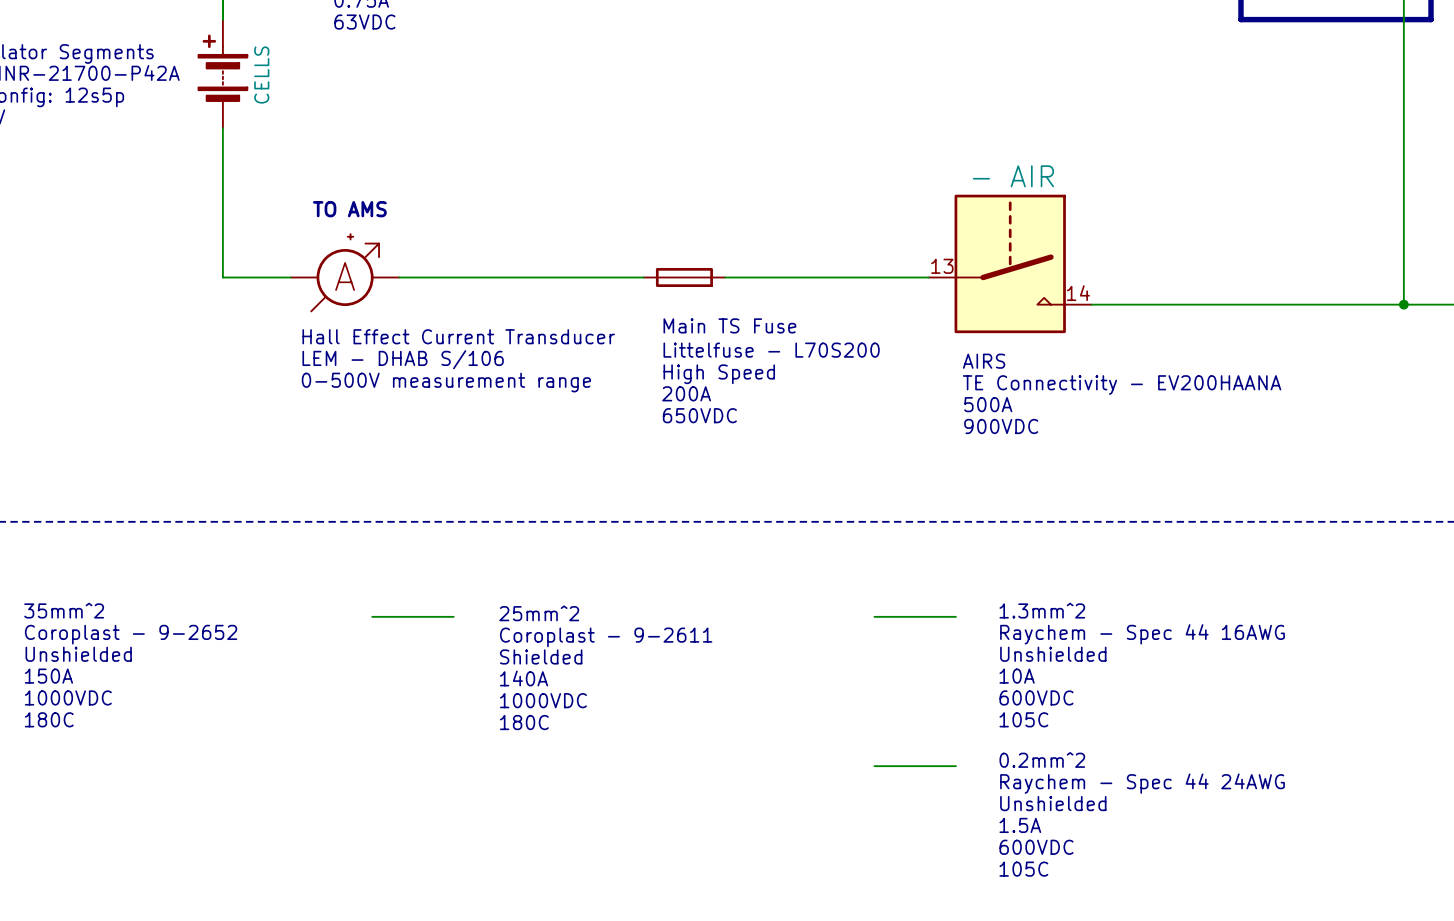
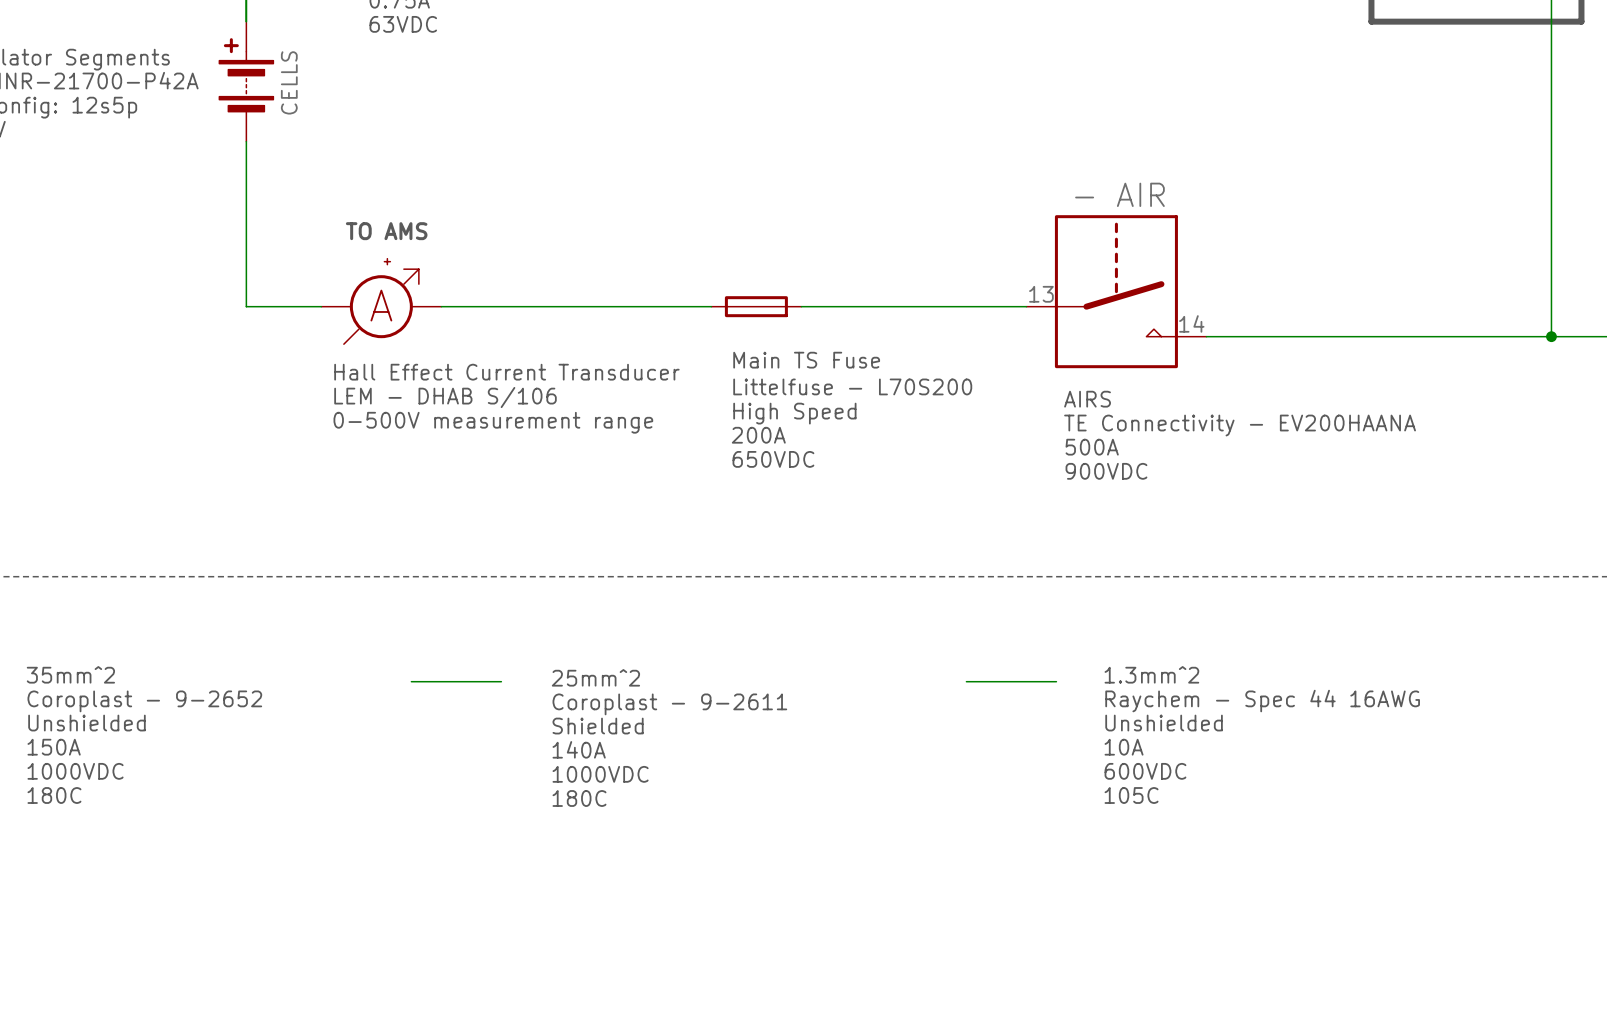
text: 0.2mm^2 (1042, 759) -> none
wire: (874, 766) (955, 766) -> none
text: Raychem - Spec 44 24AWG (1142, 783) -> none
text: Unshielded (1053, 803) -> none
text: 1.5A (1020, 825) -> none
text: 600VDC (1036, 847) -> none
text: 105C (1023, 869) -> none

